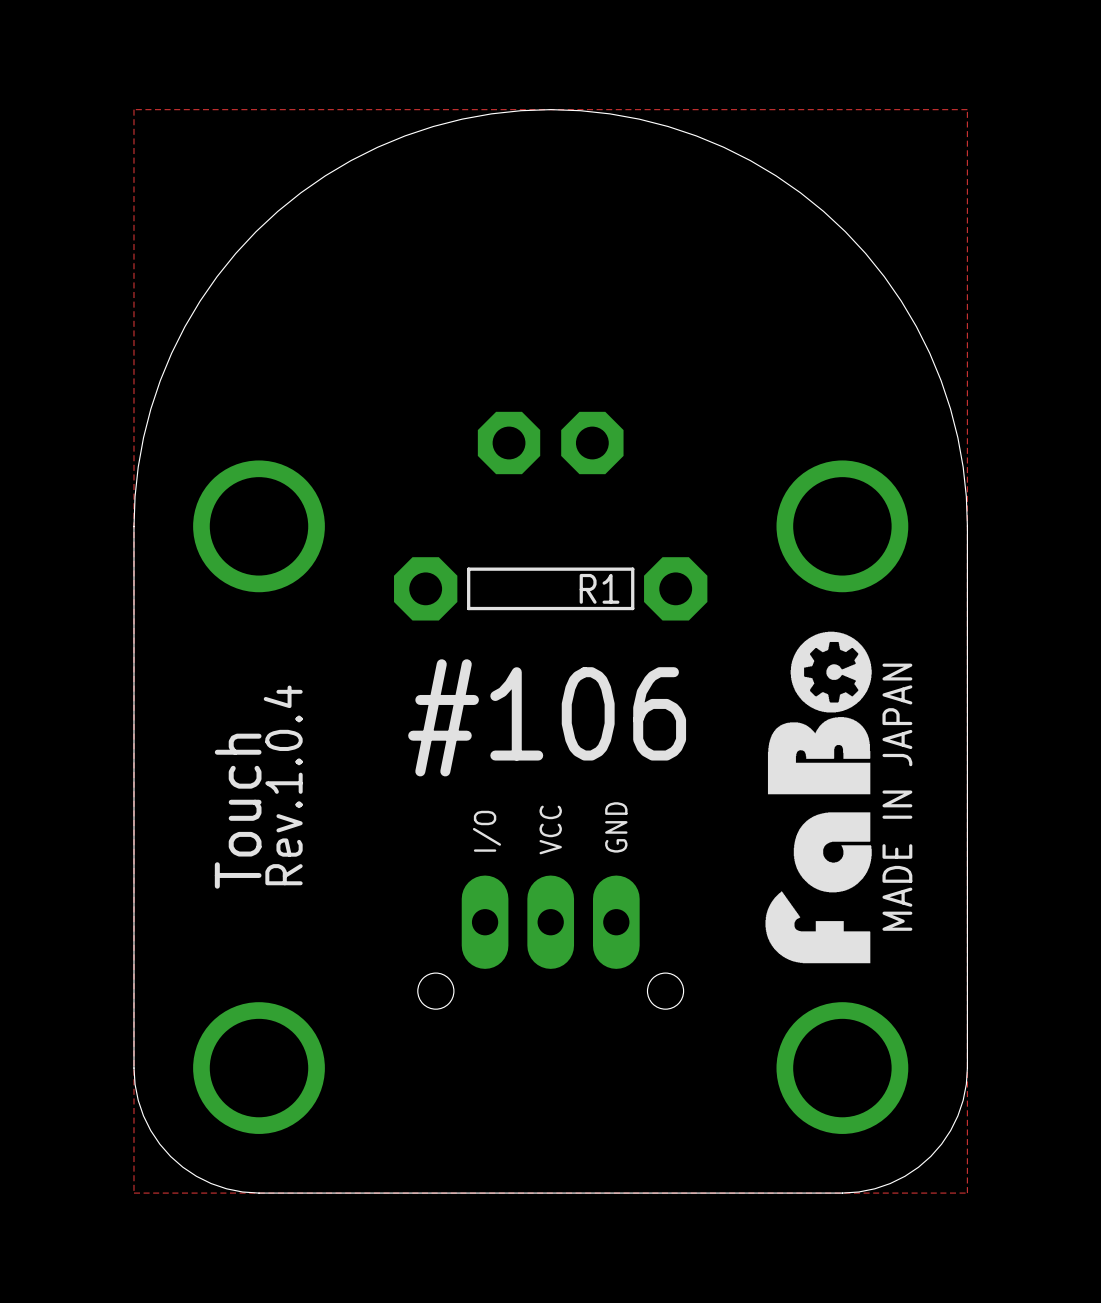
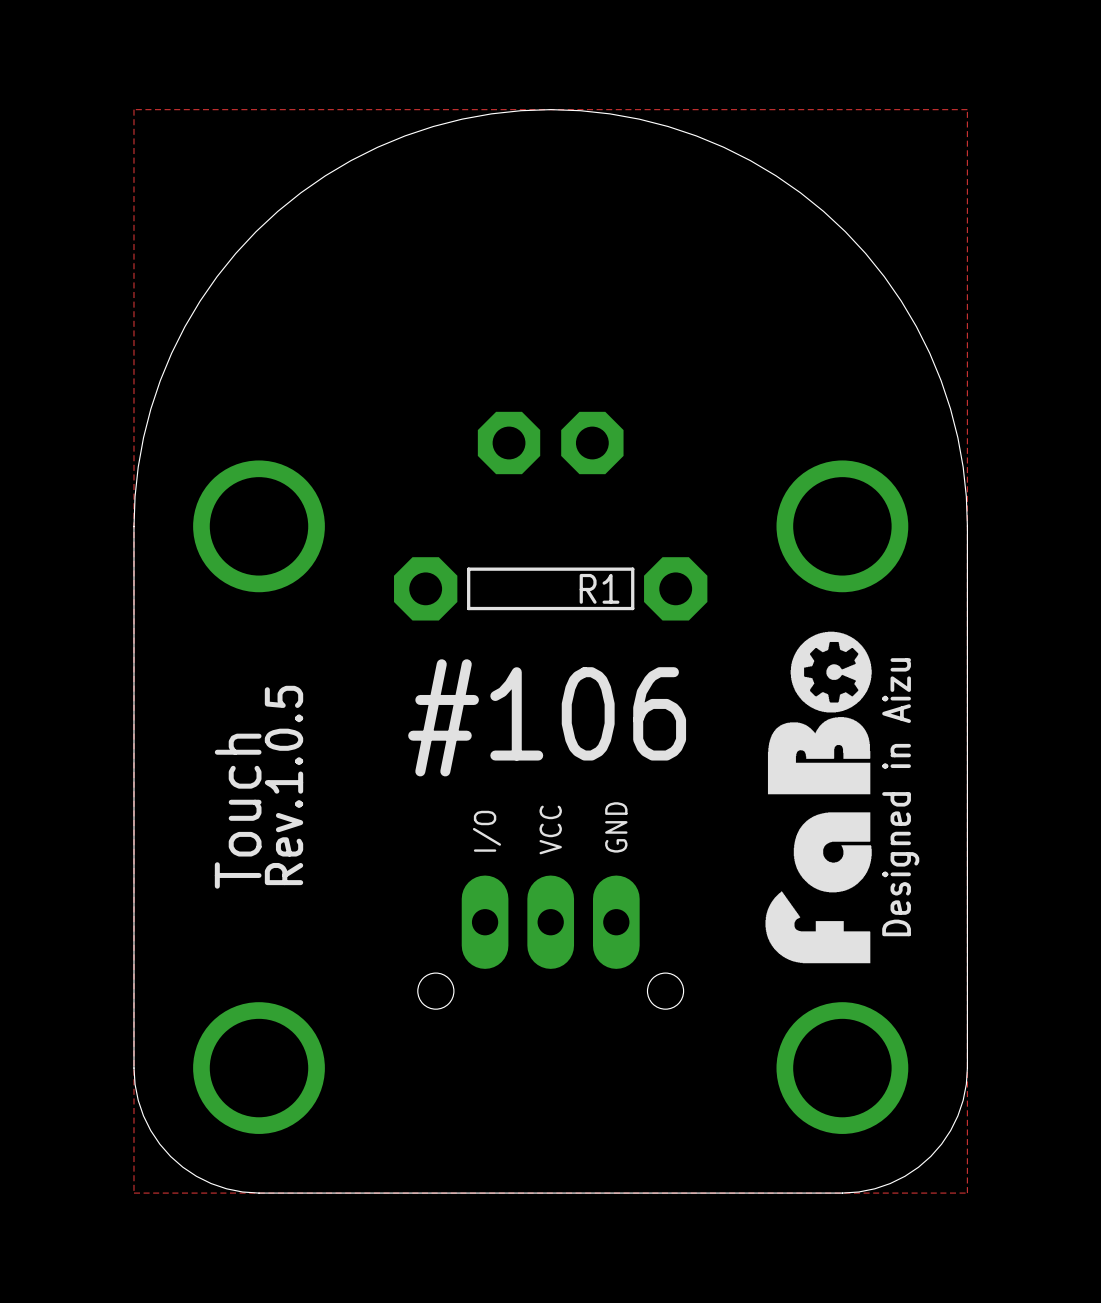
text: Rev.1.0.4 (283, 785) -> Rev.1.0.5 (284, 785)
text: MADE IN JAPAN (897, 797) -> Designed in Aizu (900, 797)

